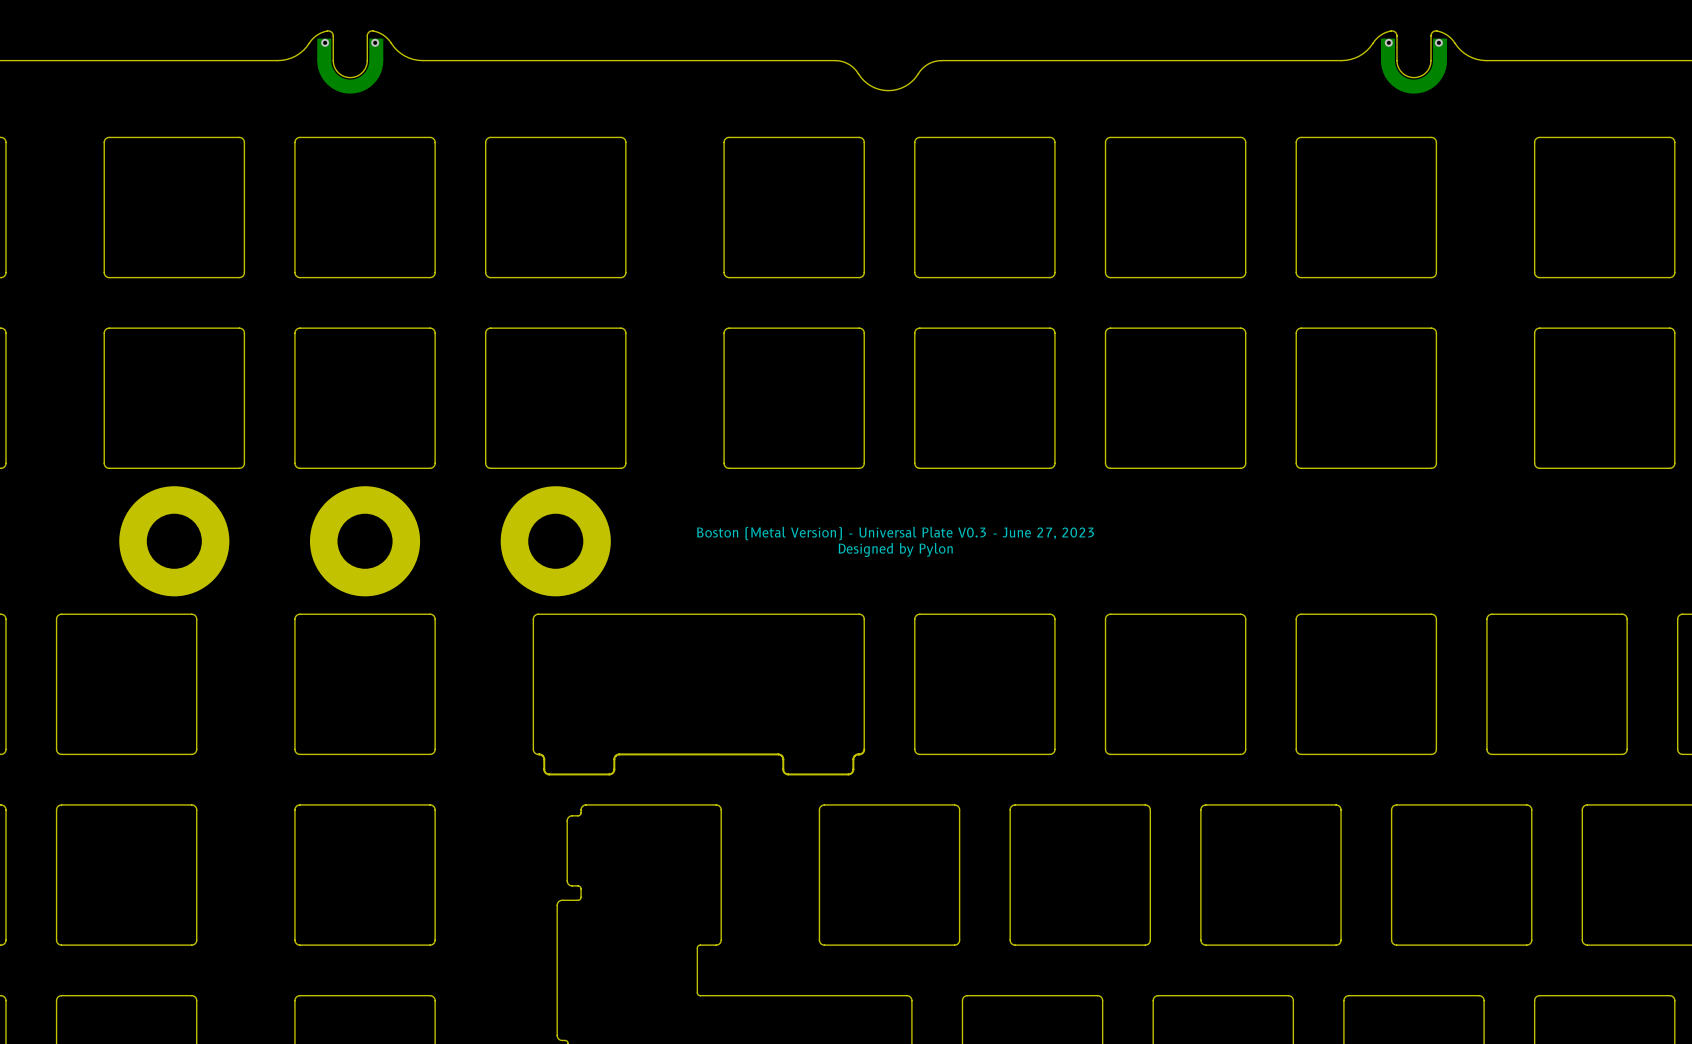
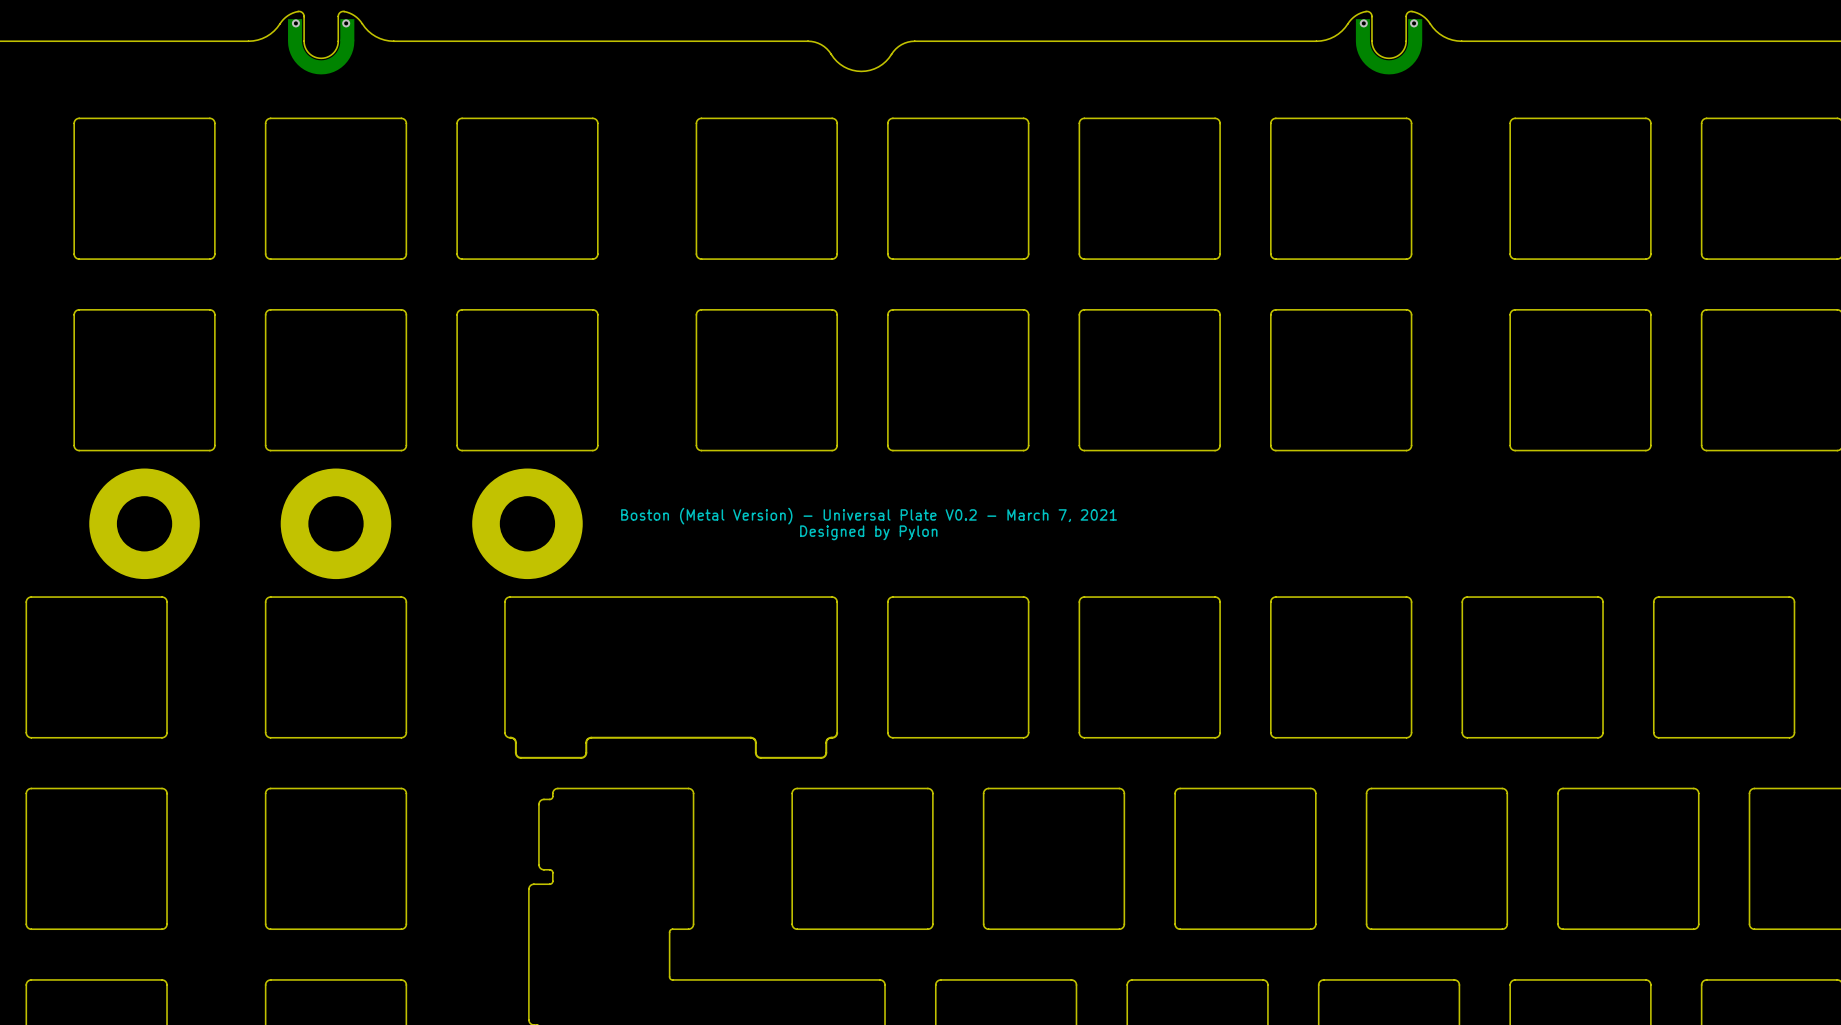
text: Boston (Metal Version) - Universal Plate V0.3 - June 27, 2023 (895, 533) -> Boston (Metal Version) - Universal Plate V0.2 - March 7, 2021 (869, 516)

